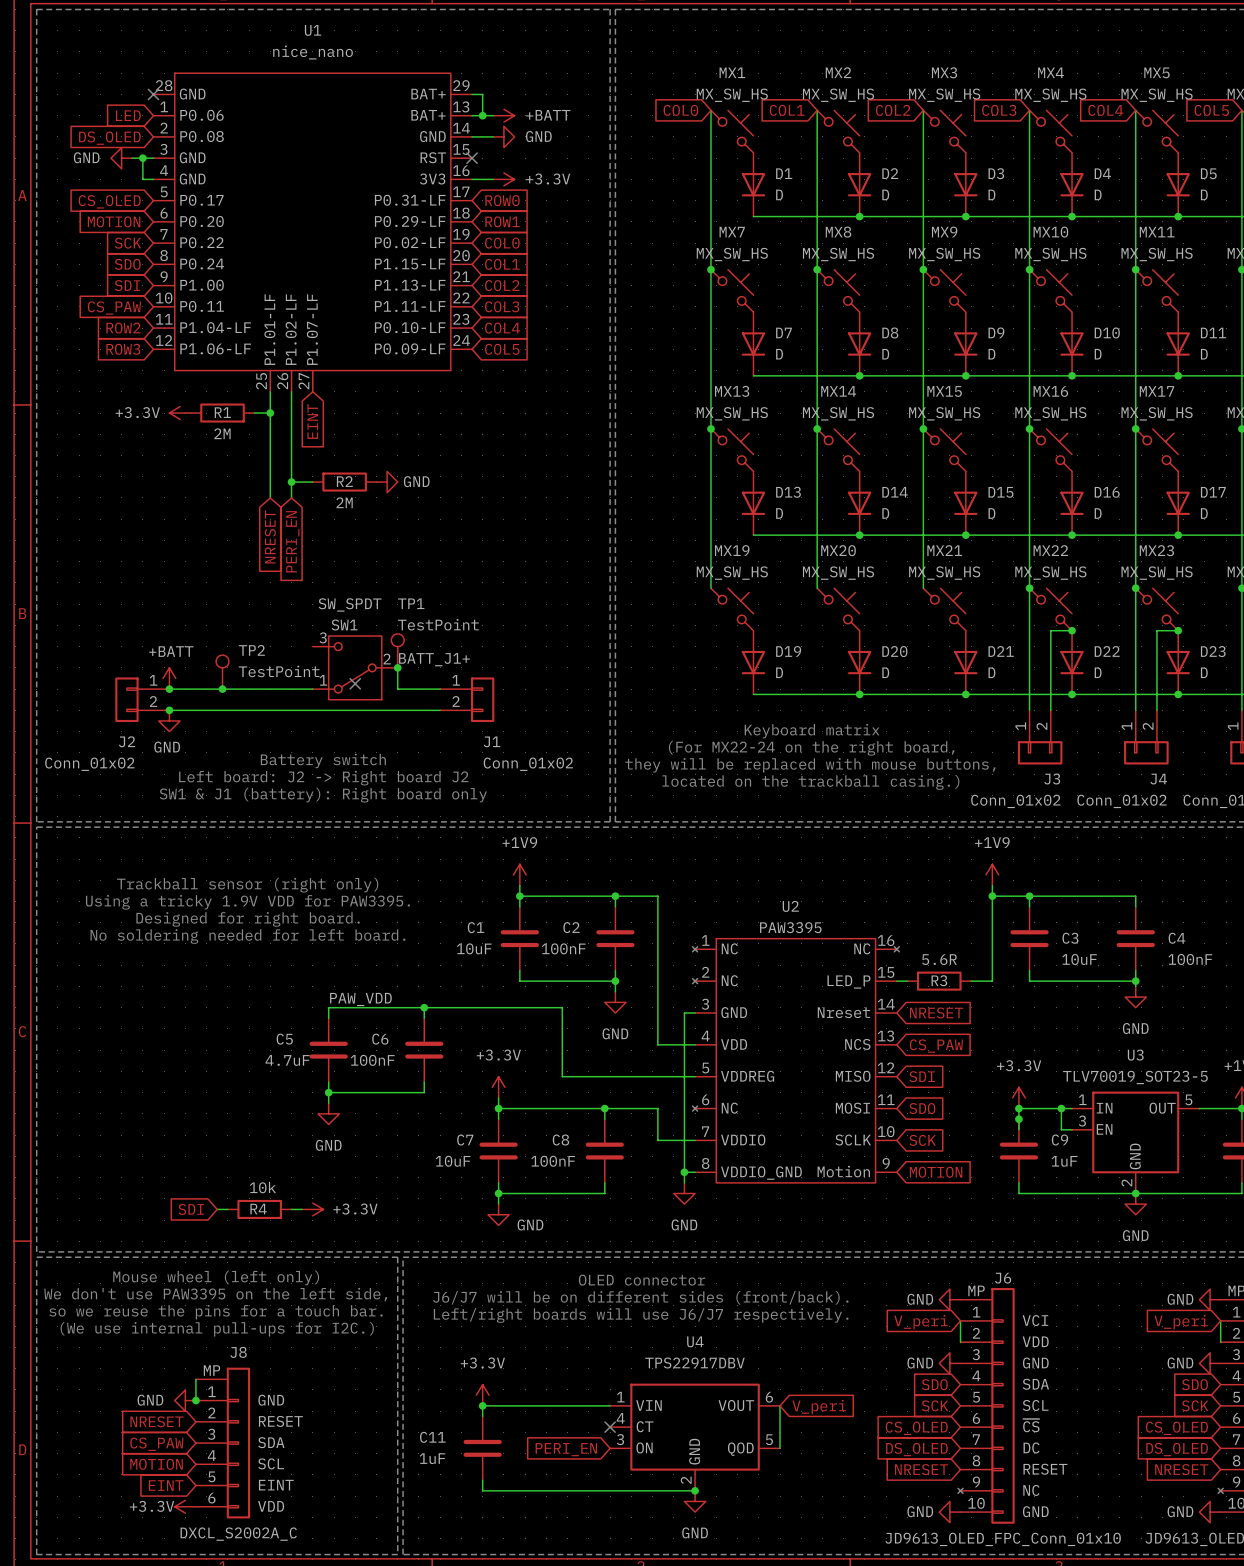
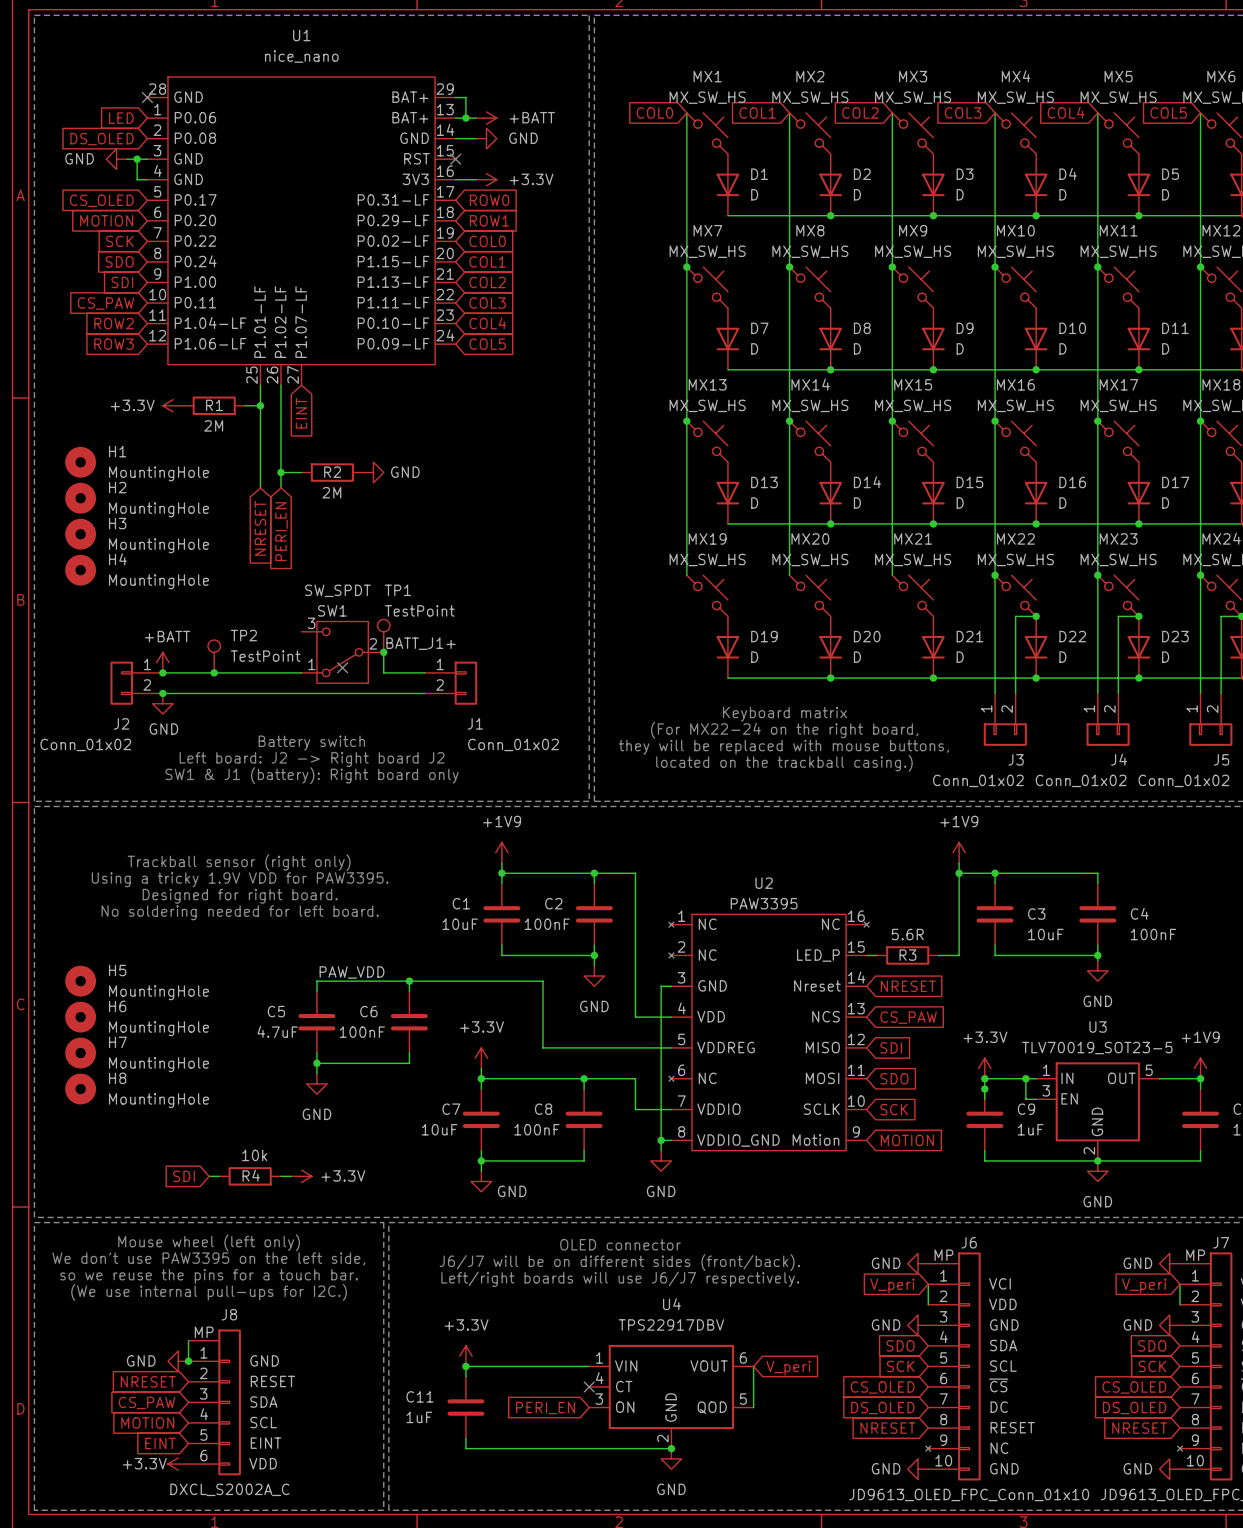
H1: none -> MountingHole (80, 462)
H2: none -> MountingHole (80, 498)
H3: none -> MountingHole (80, 534)
H4: none -> MountingHole (80, 570)
H5: none -> MountingHole (80, 981)
H6: none -> MountingHole (80, 1017)
H7: none -> MountingHole (80, 1053)
H8: none -> MountingHole (80, 1089)

